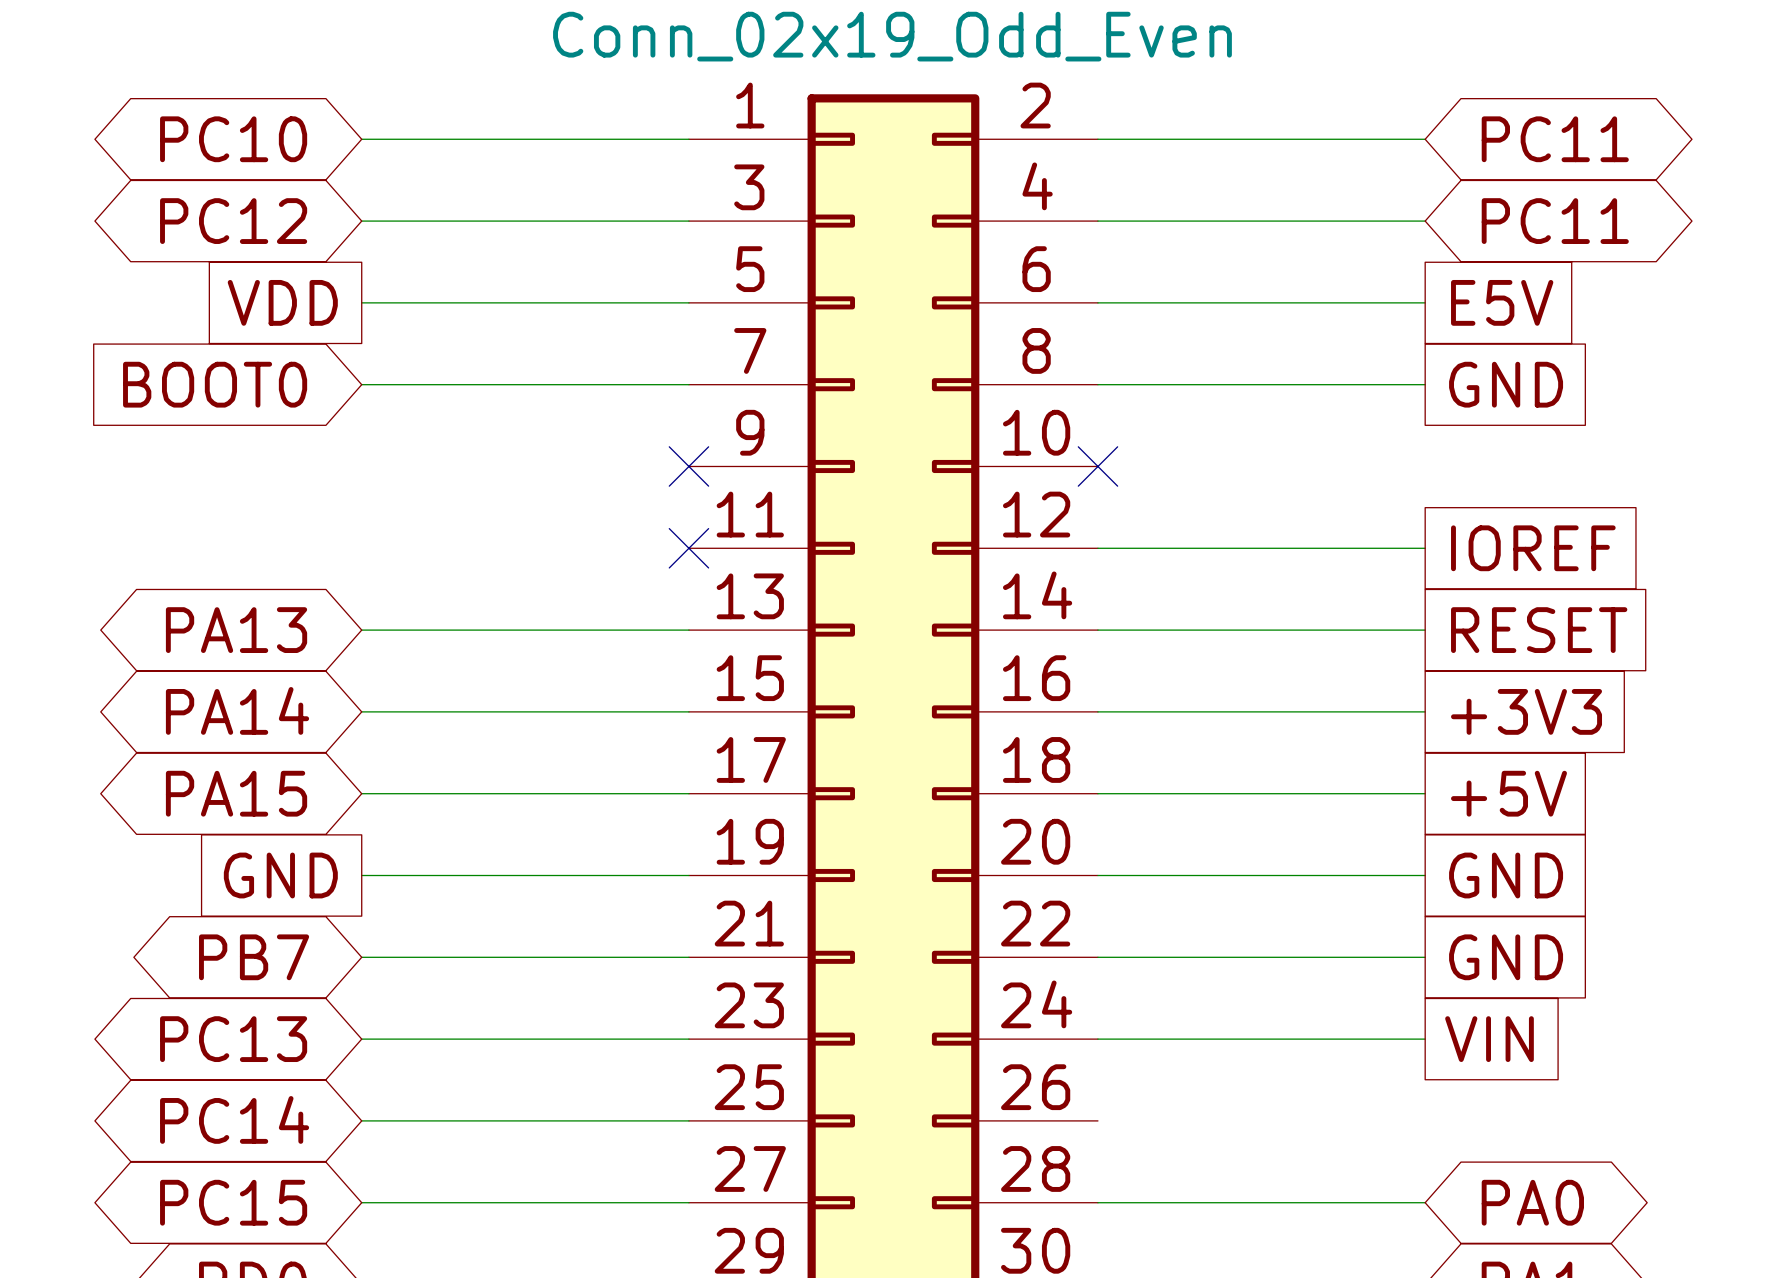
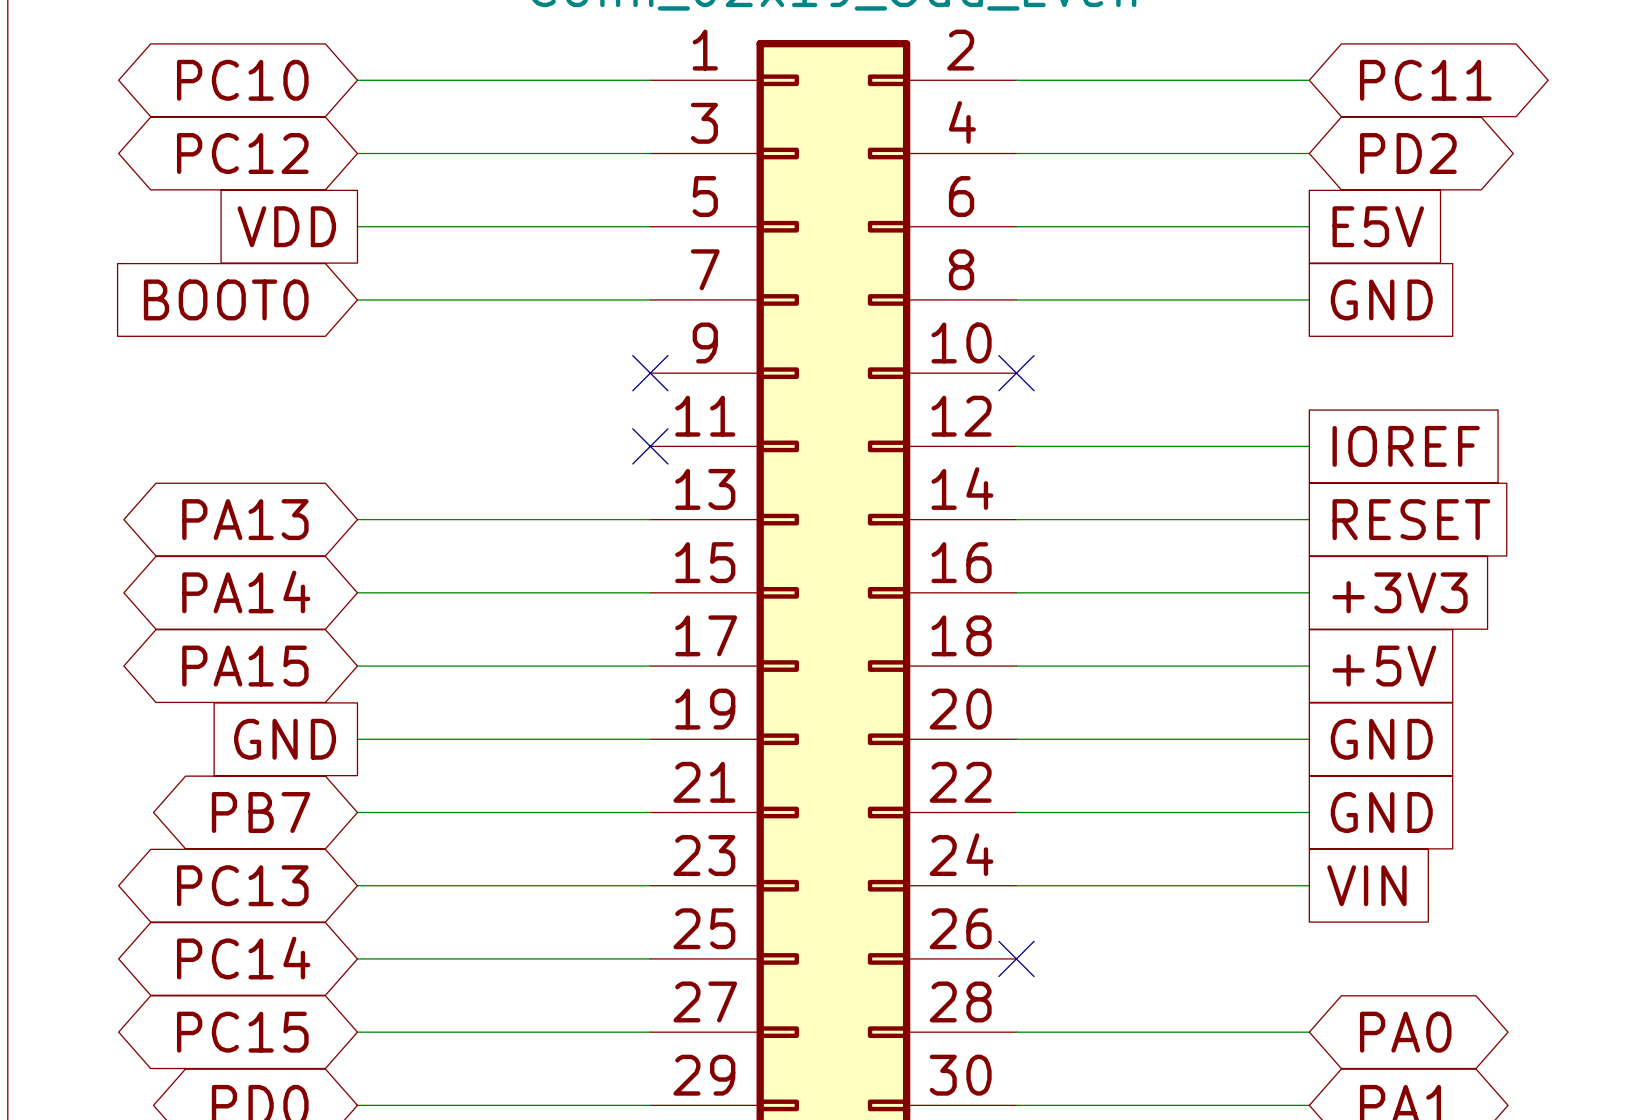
global label: PC11 (1555, 221) -> PD2 (1408, 153)
no-connect mark: none -> (1016, 958)

